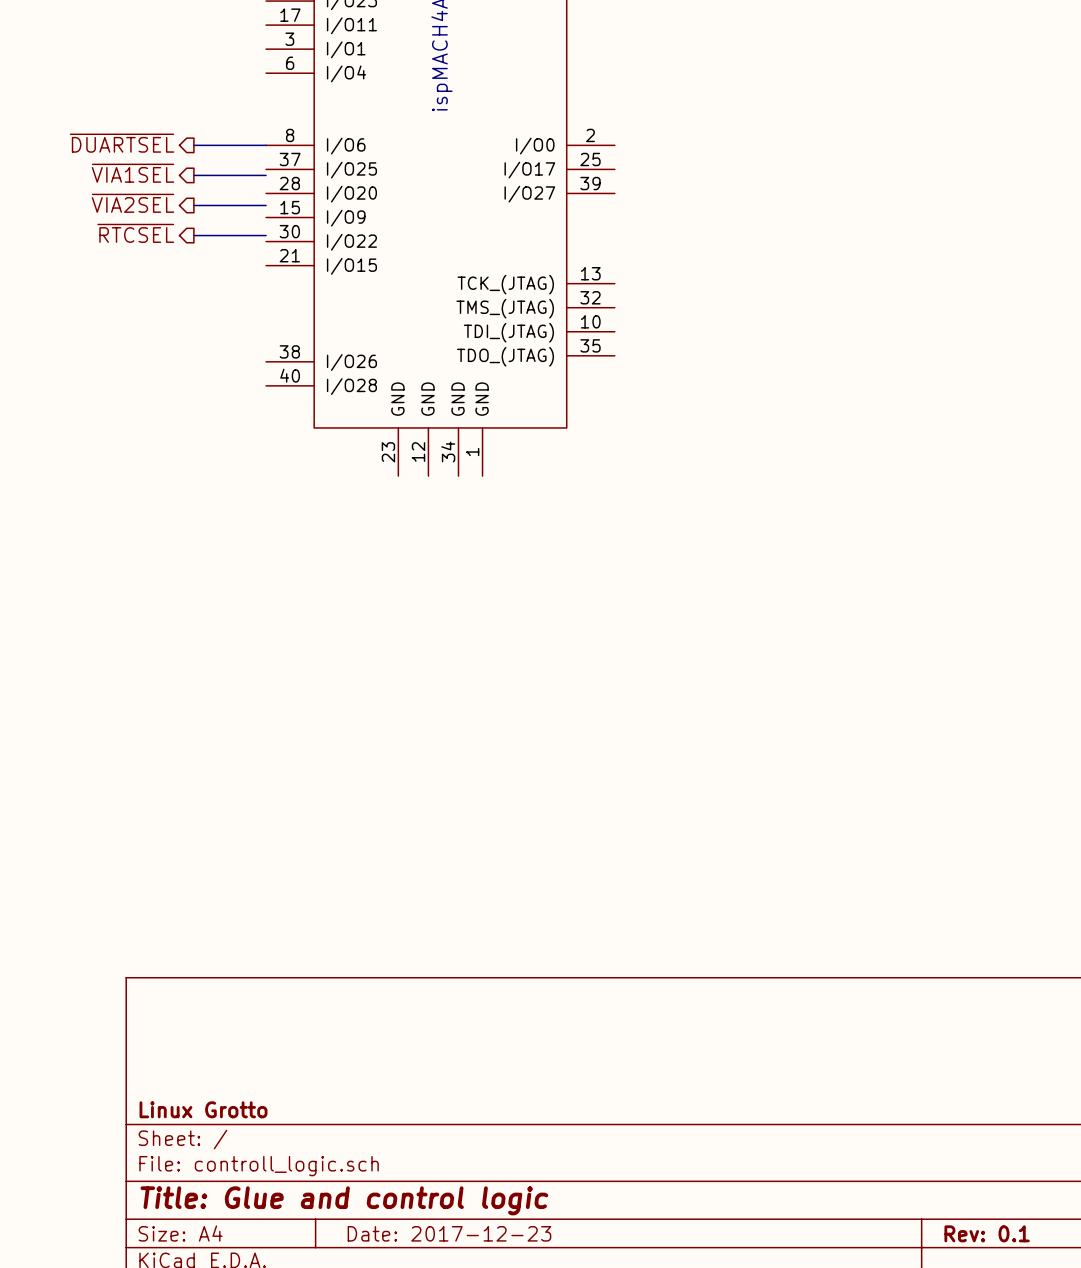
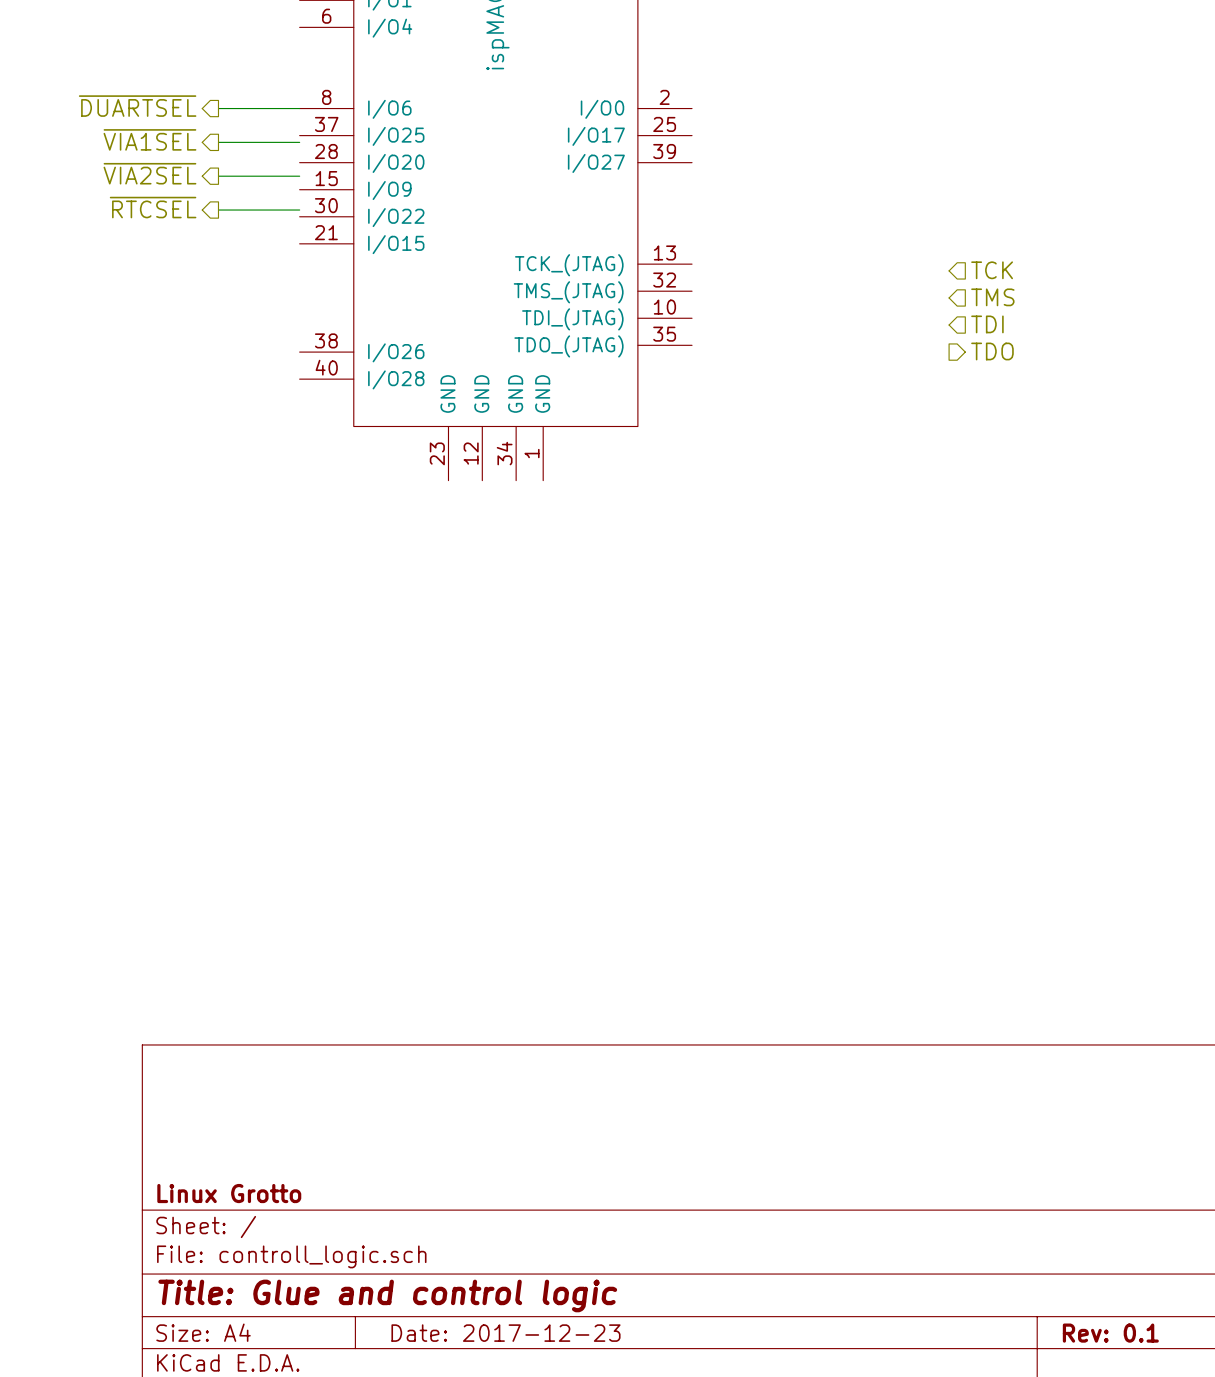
hierarchical label: none -> TCK (992, 270)
hierarchical label: none -> TMS (992, 297)
hierarchical label: none -> TDI (987, 324)
hierarchical label: none -> TDO (992, 351)

